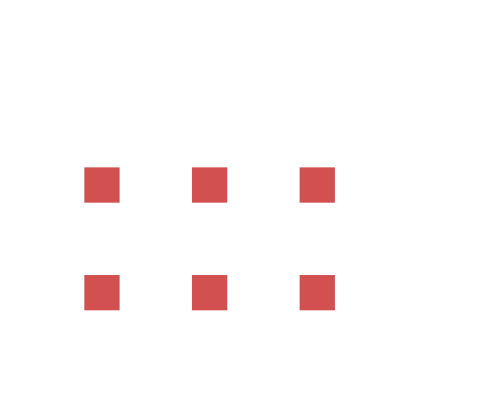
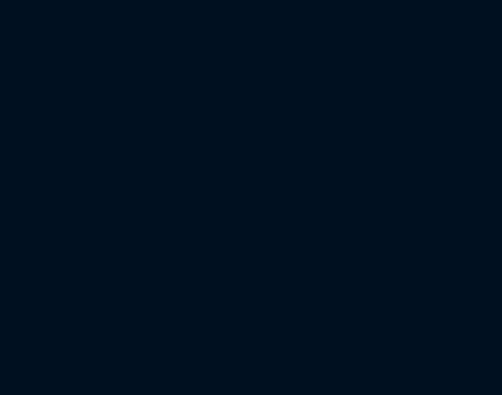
part: (101, 185) -> none
part: (209, 185) -> none
part: (317, 185) -> none
part: (101, 292) -> none
part: (209, 292) -> none
part: (317, 292) -> none

